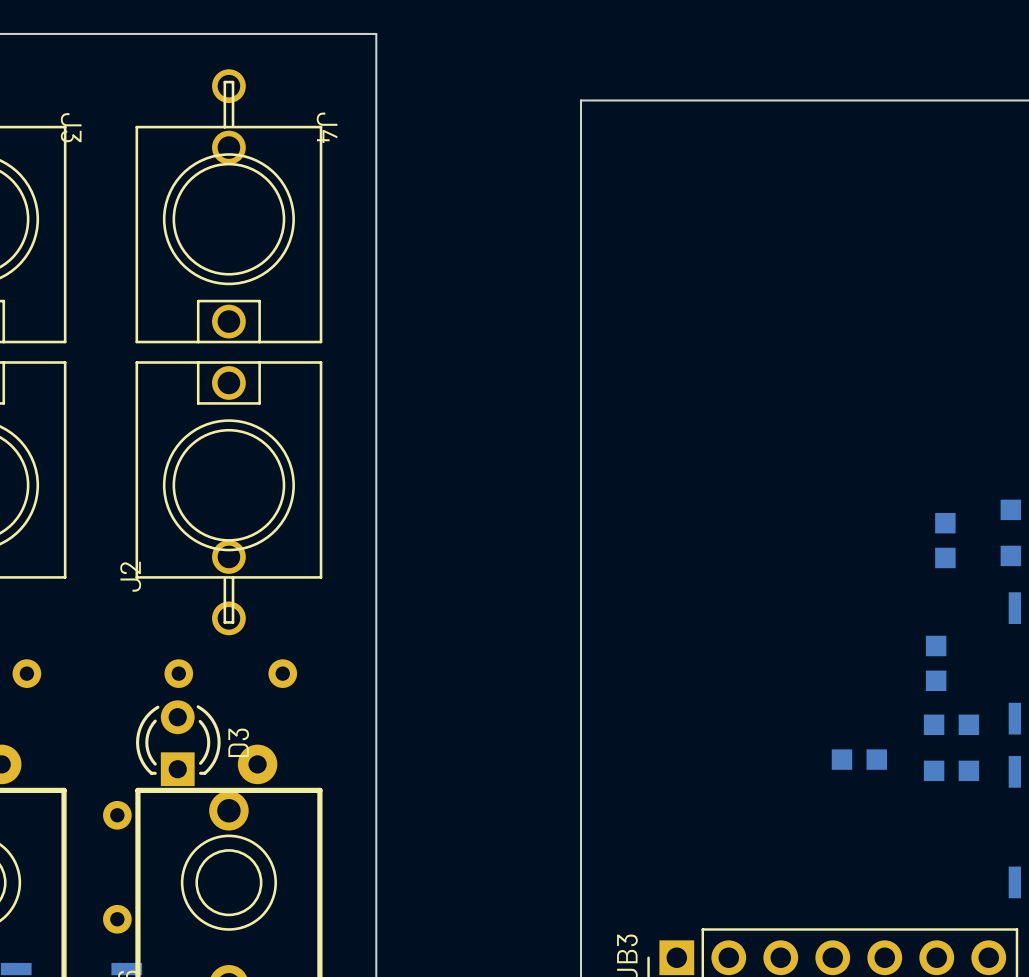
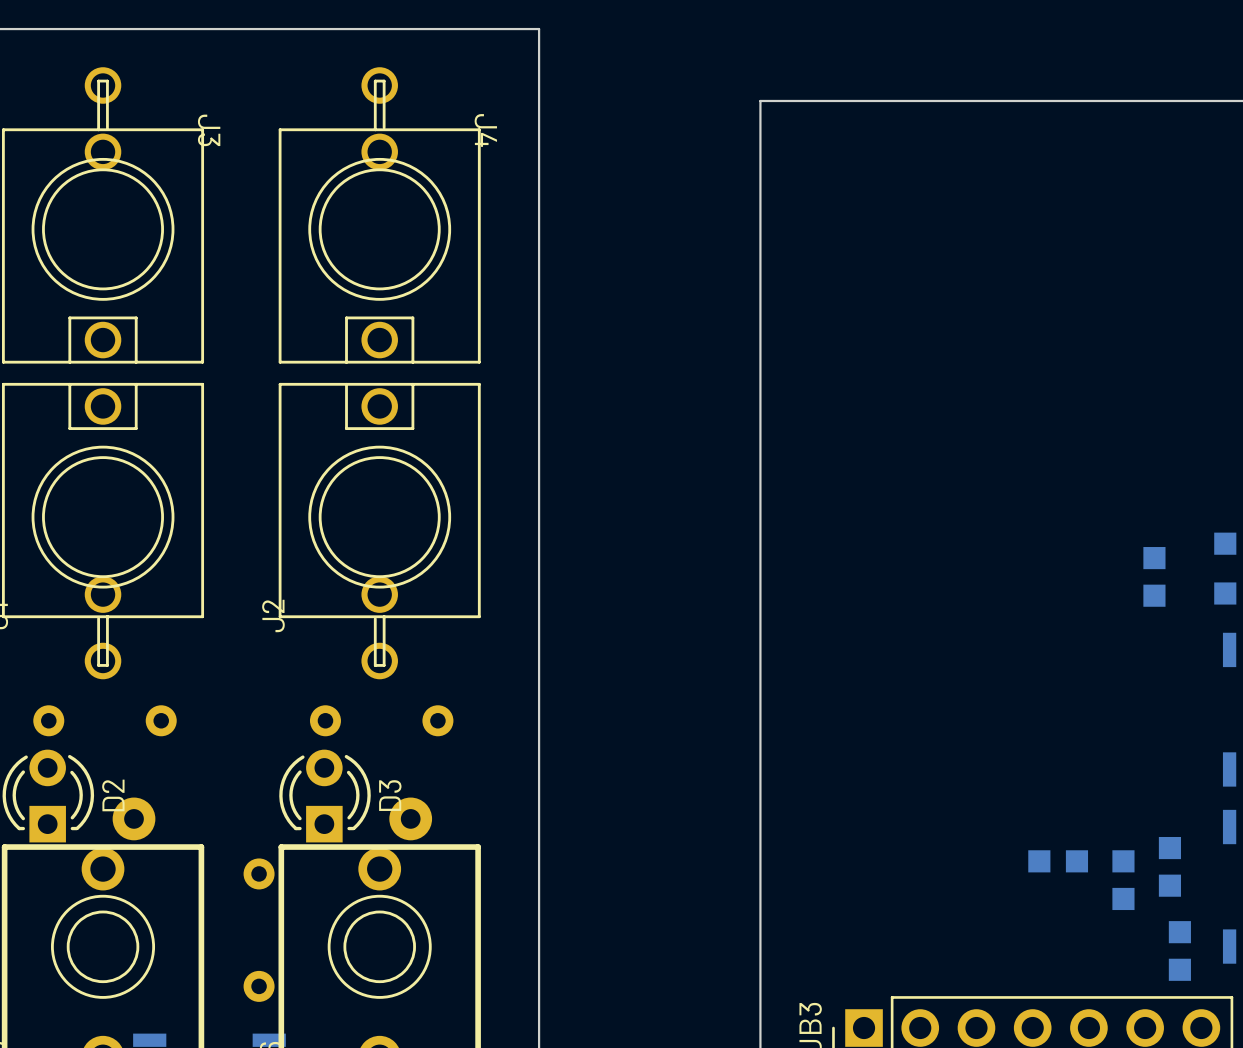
part: (936, 663) -> none
part: (951, 724) -> none
part: (859, 759) -> none
part: (951, 770) -> none
part: none -> (1058, 861)
part: none -> (1169, 866)
part: none -> (1123, 880)
part: none -> (1179, 950)

